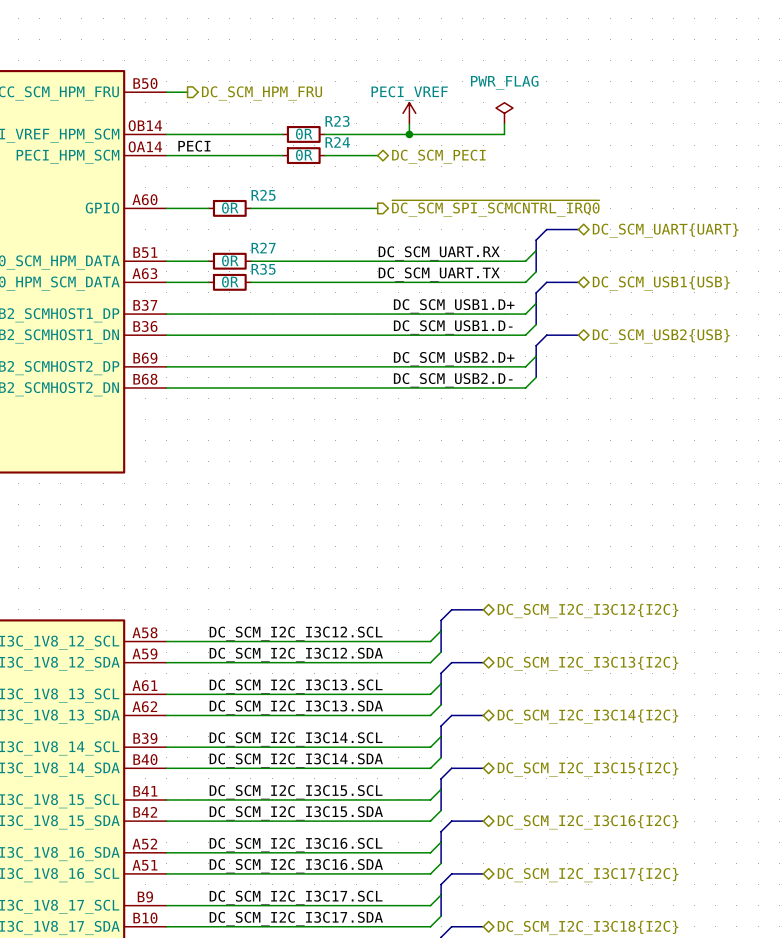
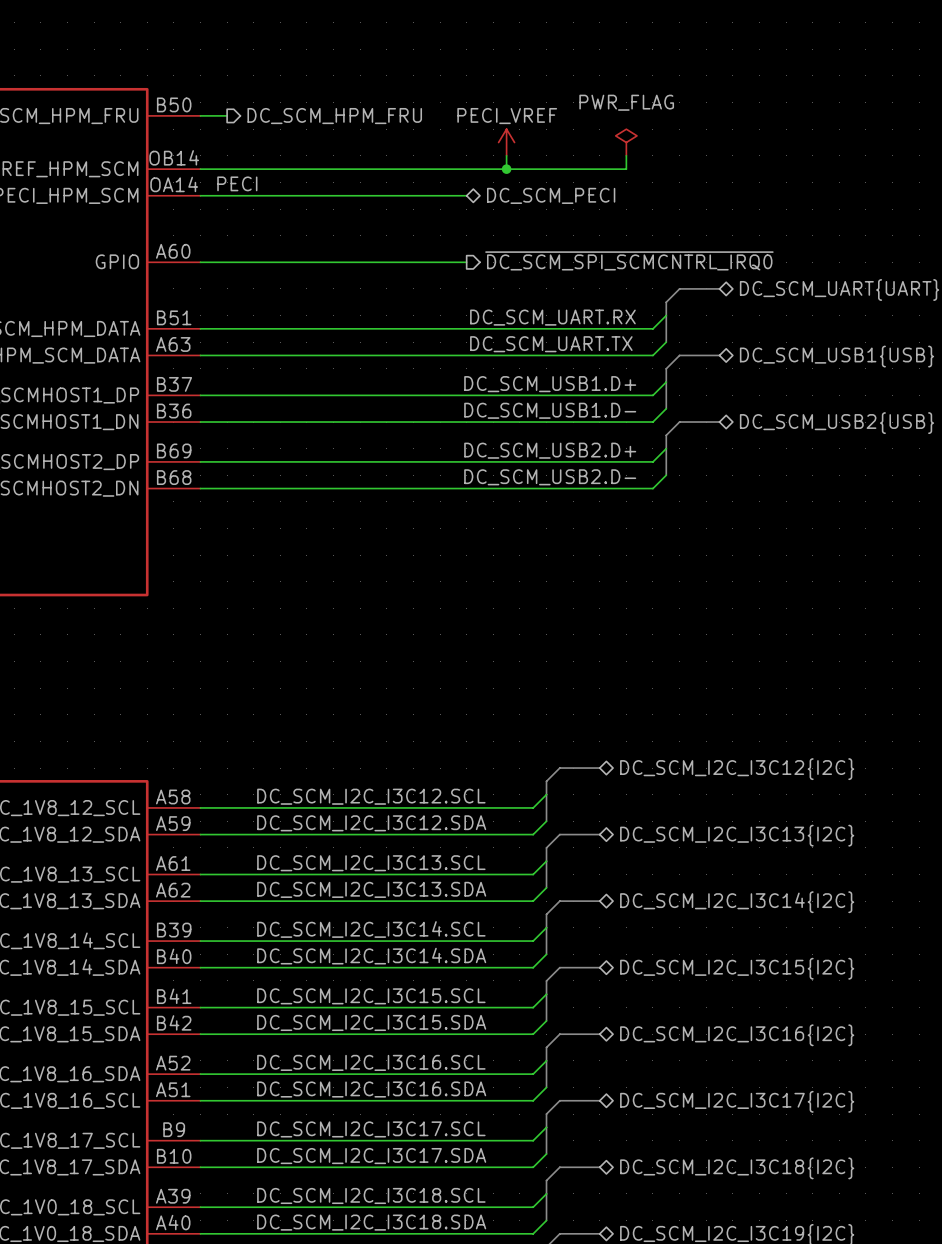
wire: none -> (346, 169) (400, 169)
R23: (303, 134) -> none
wire: none -> (346, 195) (400, 195)
R24: (303, 155) -> none
wire: none -> (253, 262) (306, 262)
R25: (229, 208) -> none
wire: none -> (253, 328) (306, 328)
R27: (229, 261) -> none
wire: none -> (253, 355) (306, 355)
R35: (229, 282) -> none

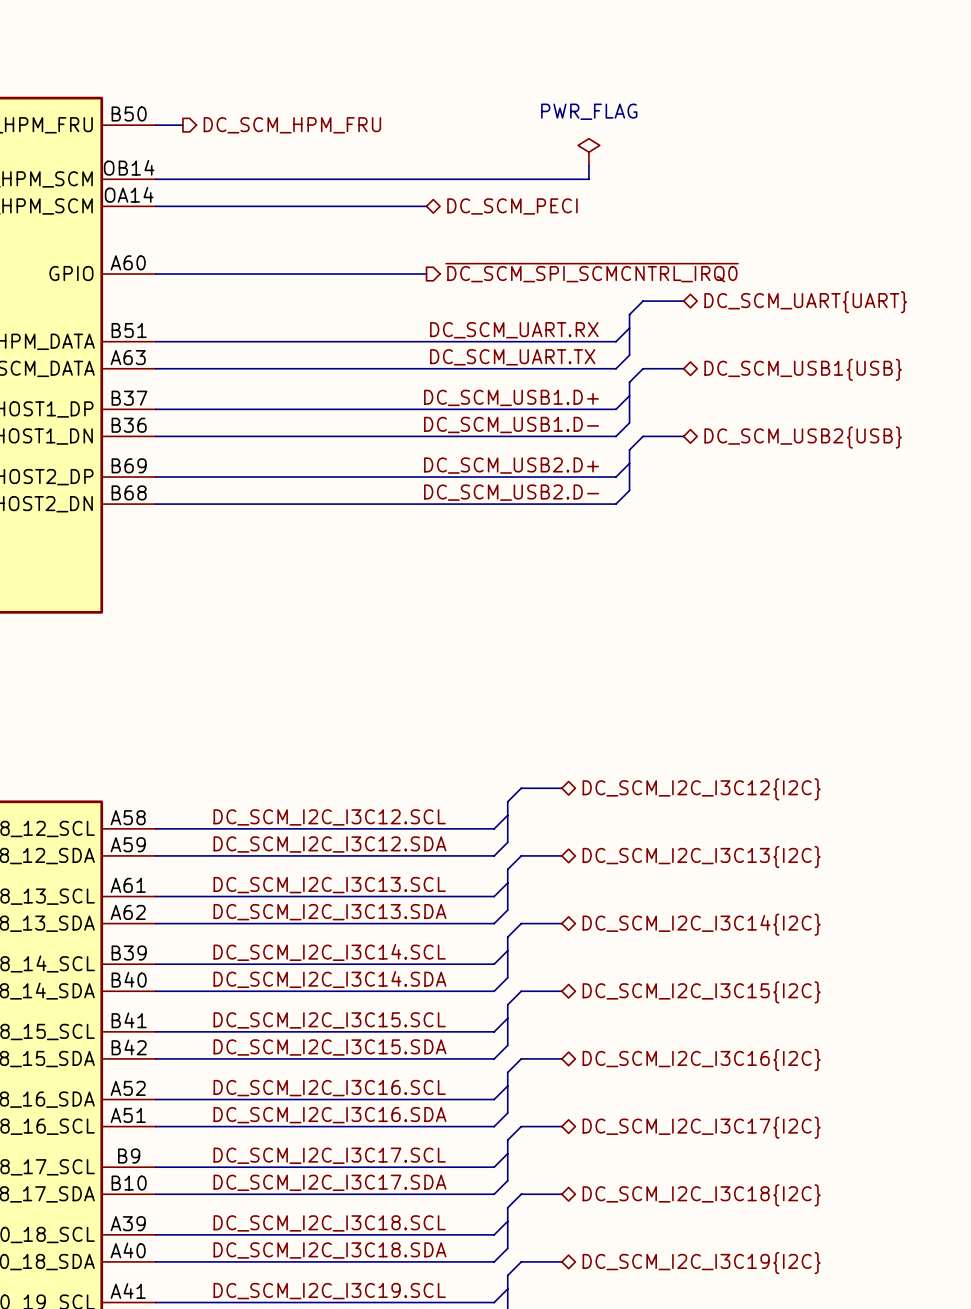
power symbol: PECI_VREF (506, 142) -> none
wire: (506, 155) (506, 169) -> none
junction: (506, 169) -> none
label: PECI (237, 183) -> none

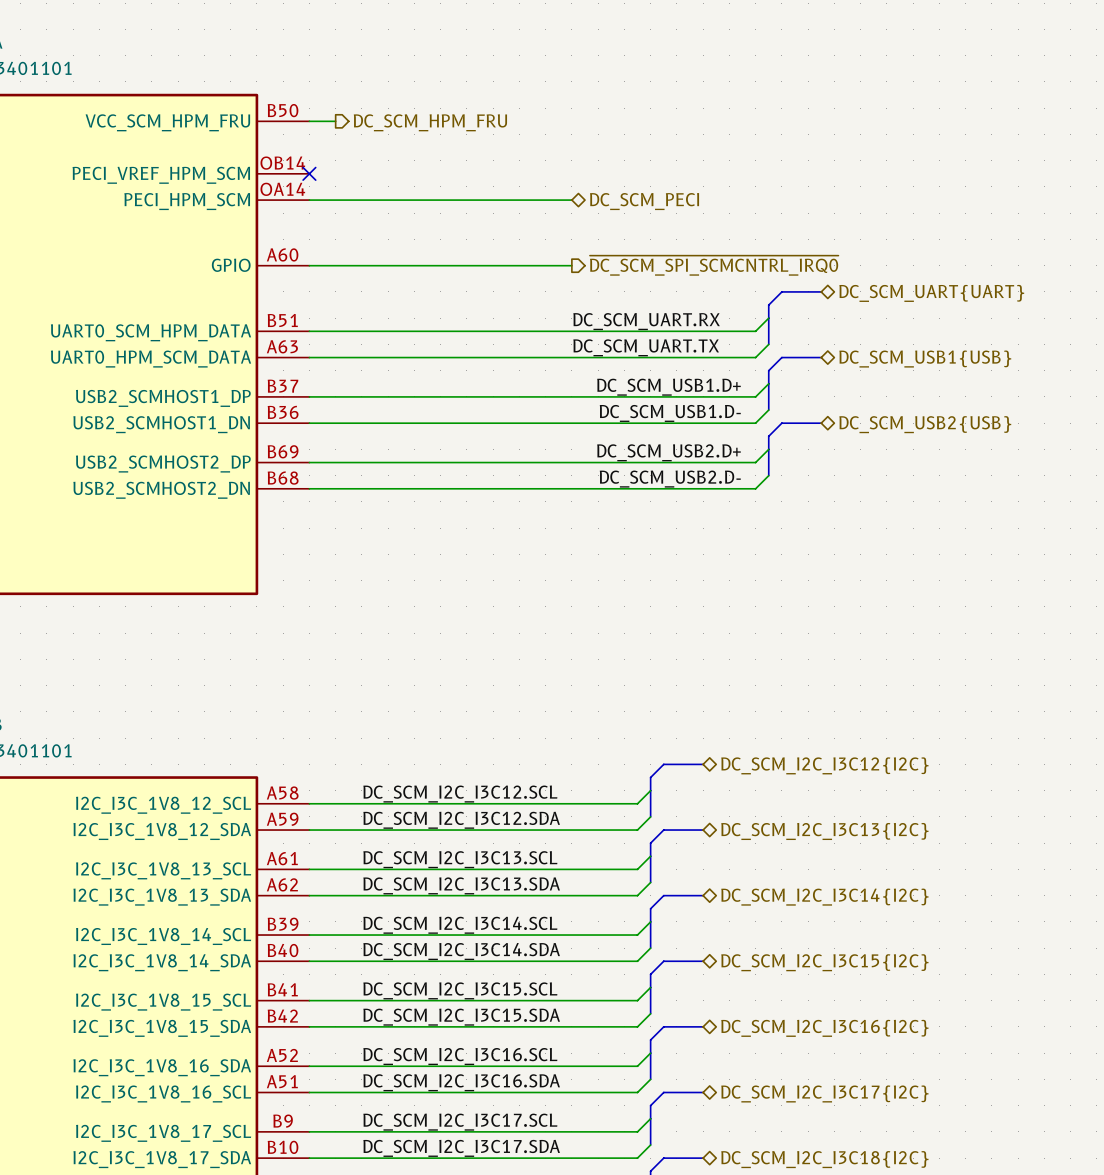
power symbol: PWR_FLAG (588, 152) -> none
wire: (588, 165) (588, 179) (155, 179) -> none
no-connect mark: none -> (309, 173)

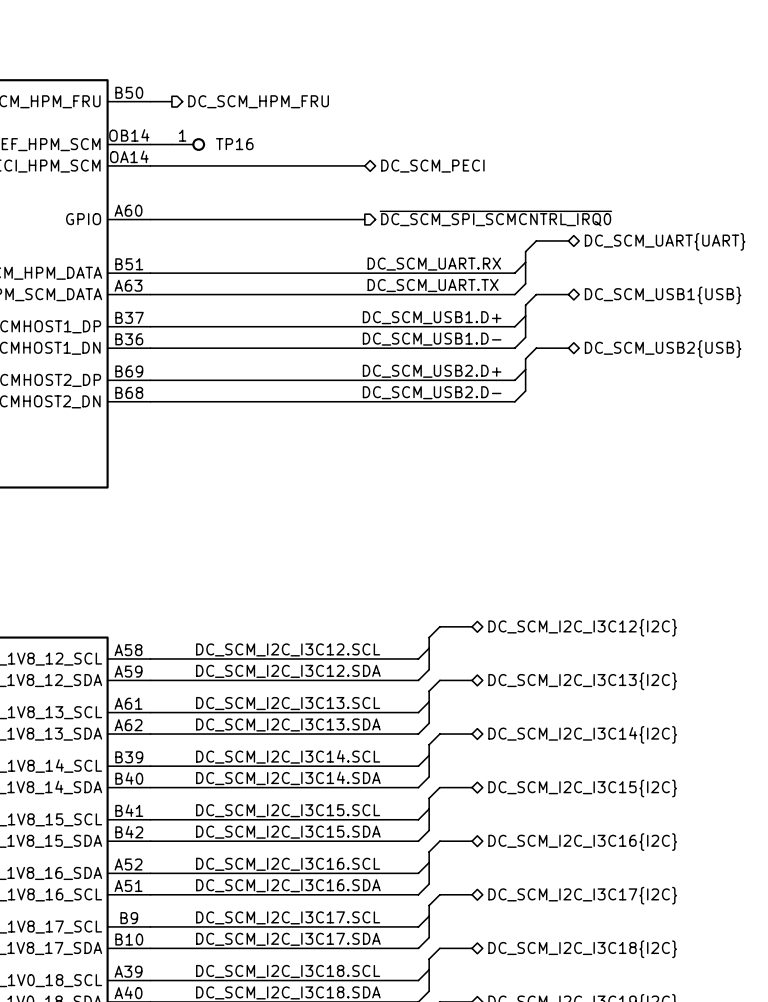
wire: none -> (150, 144) (171, 144)
no-connect mark: (309, 173) -> none
TP16: none -> (188, 144)

